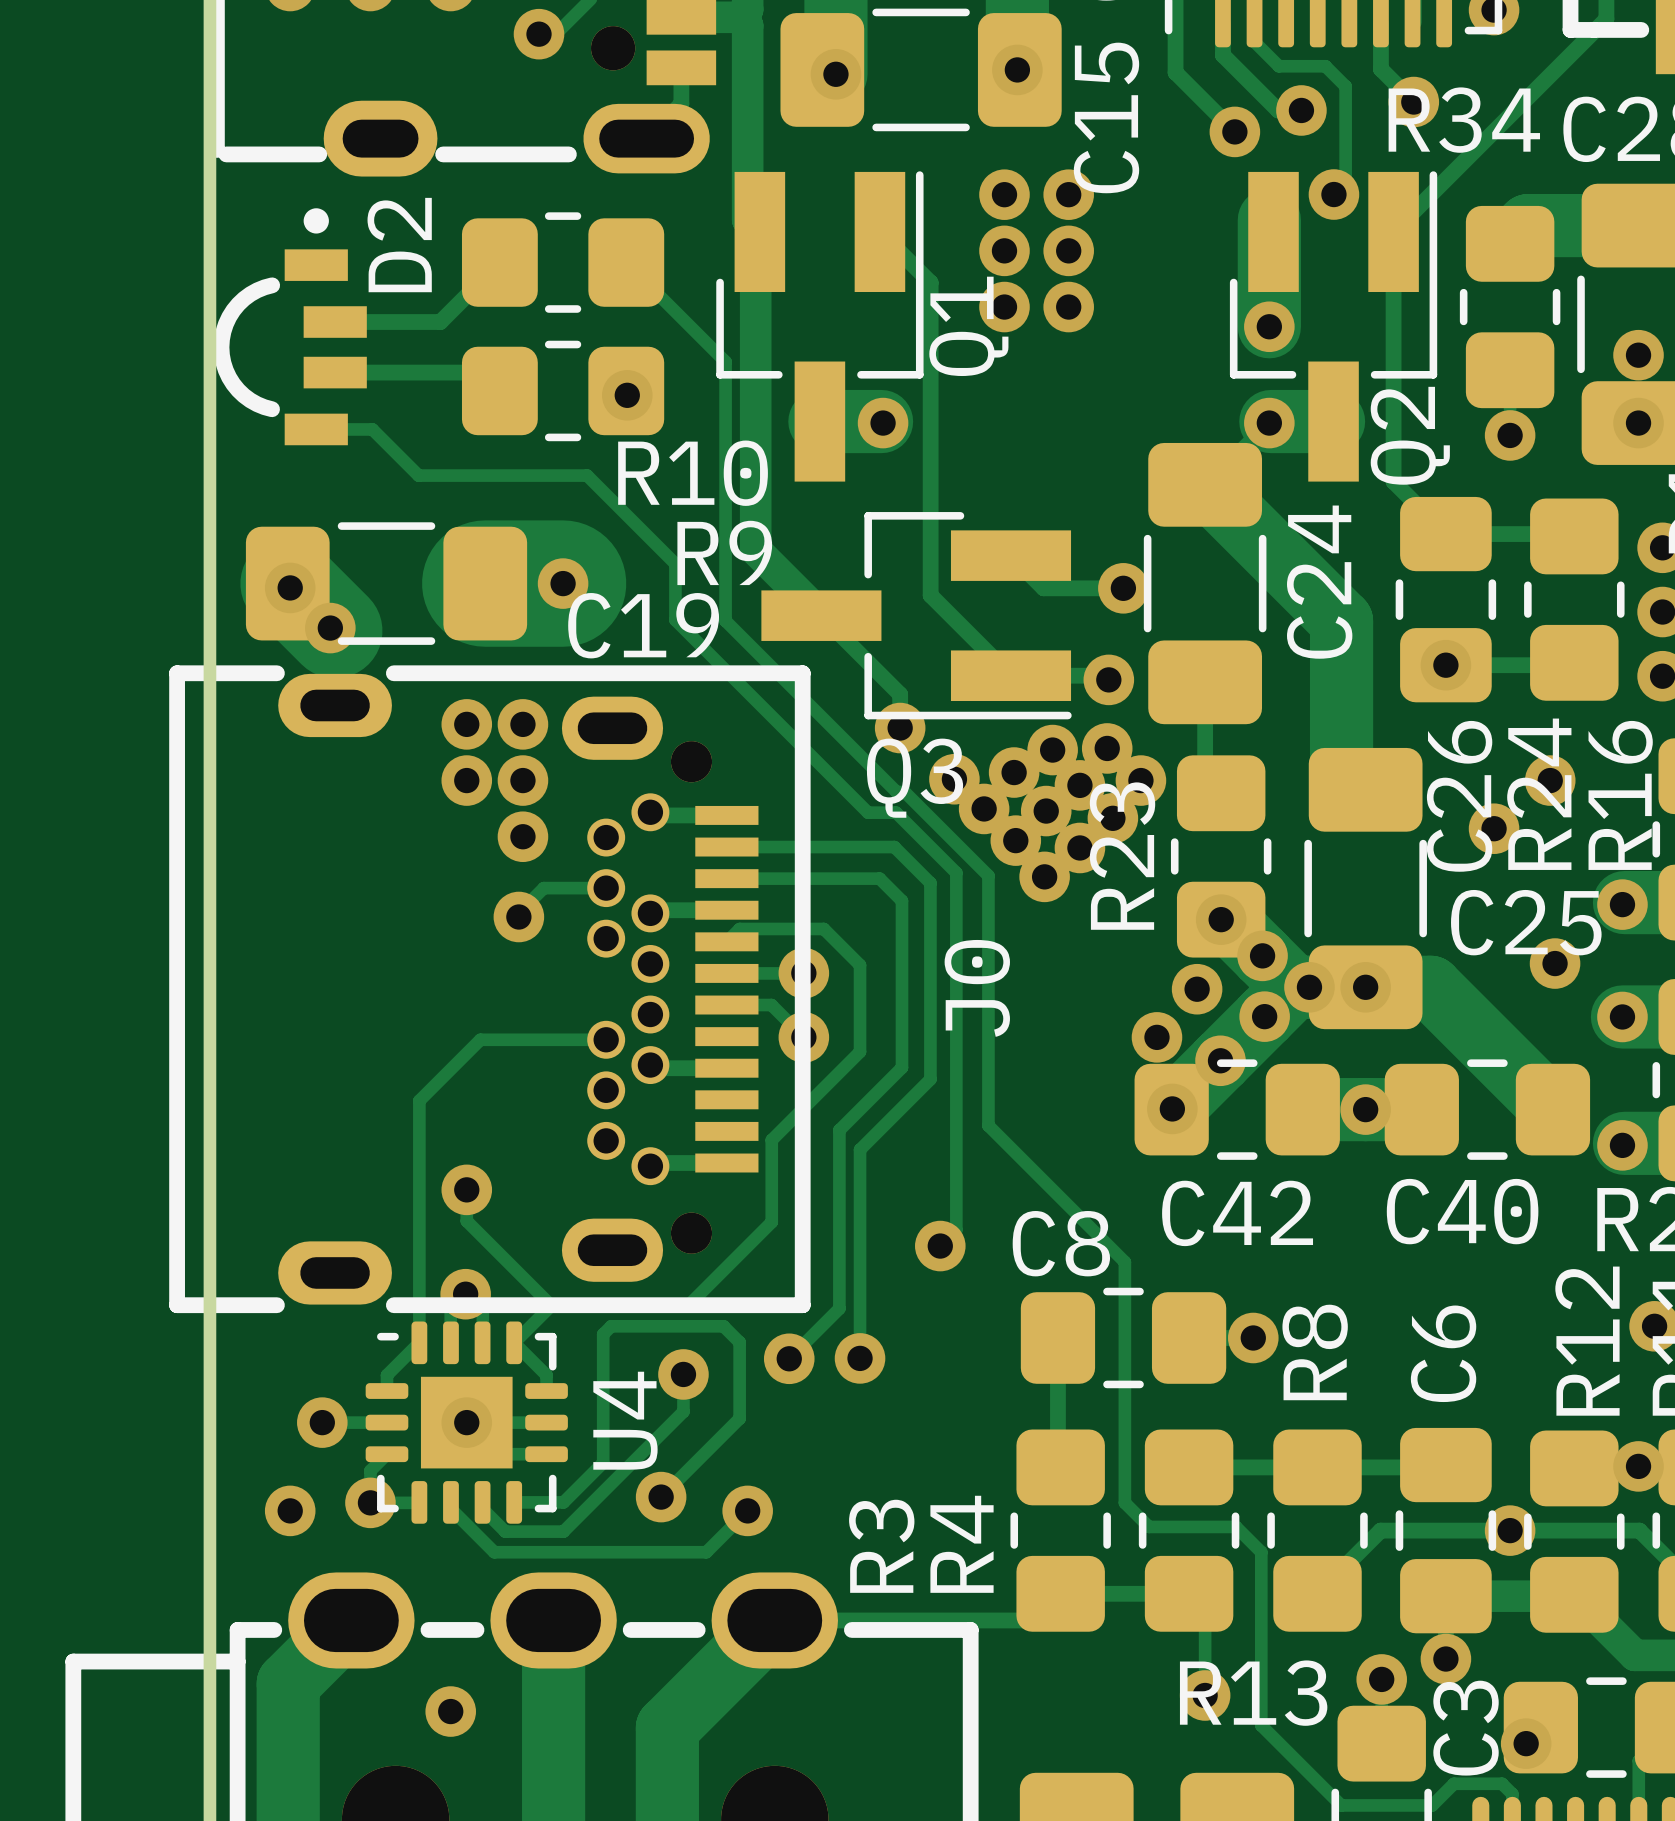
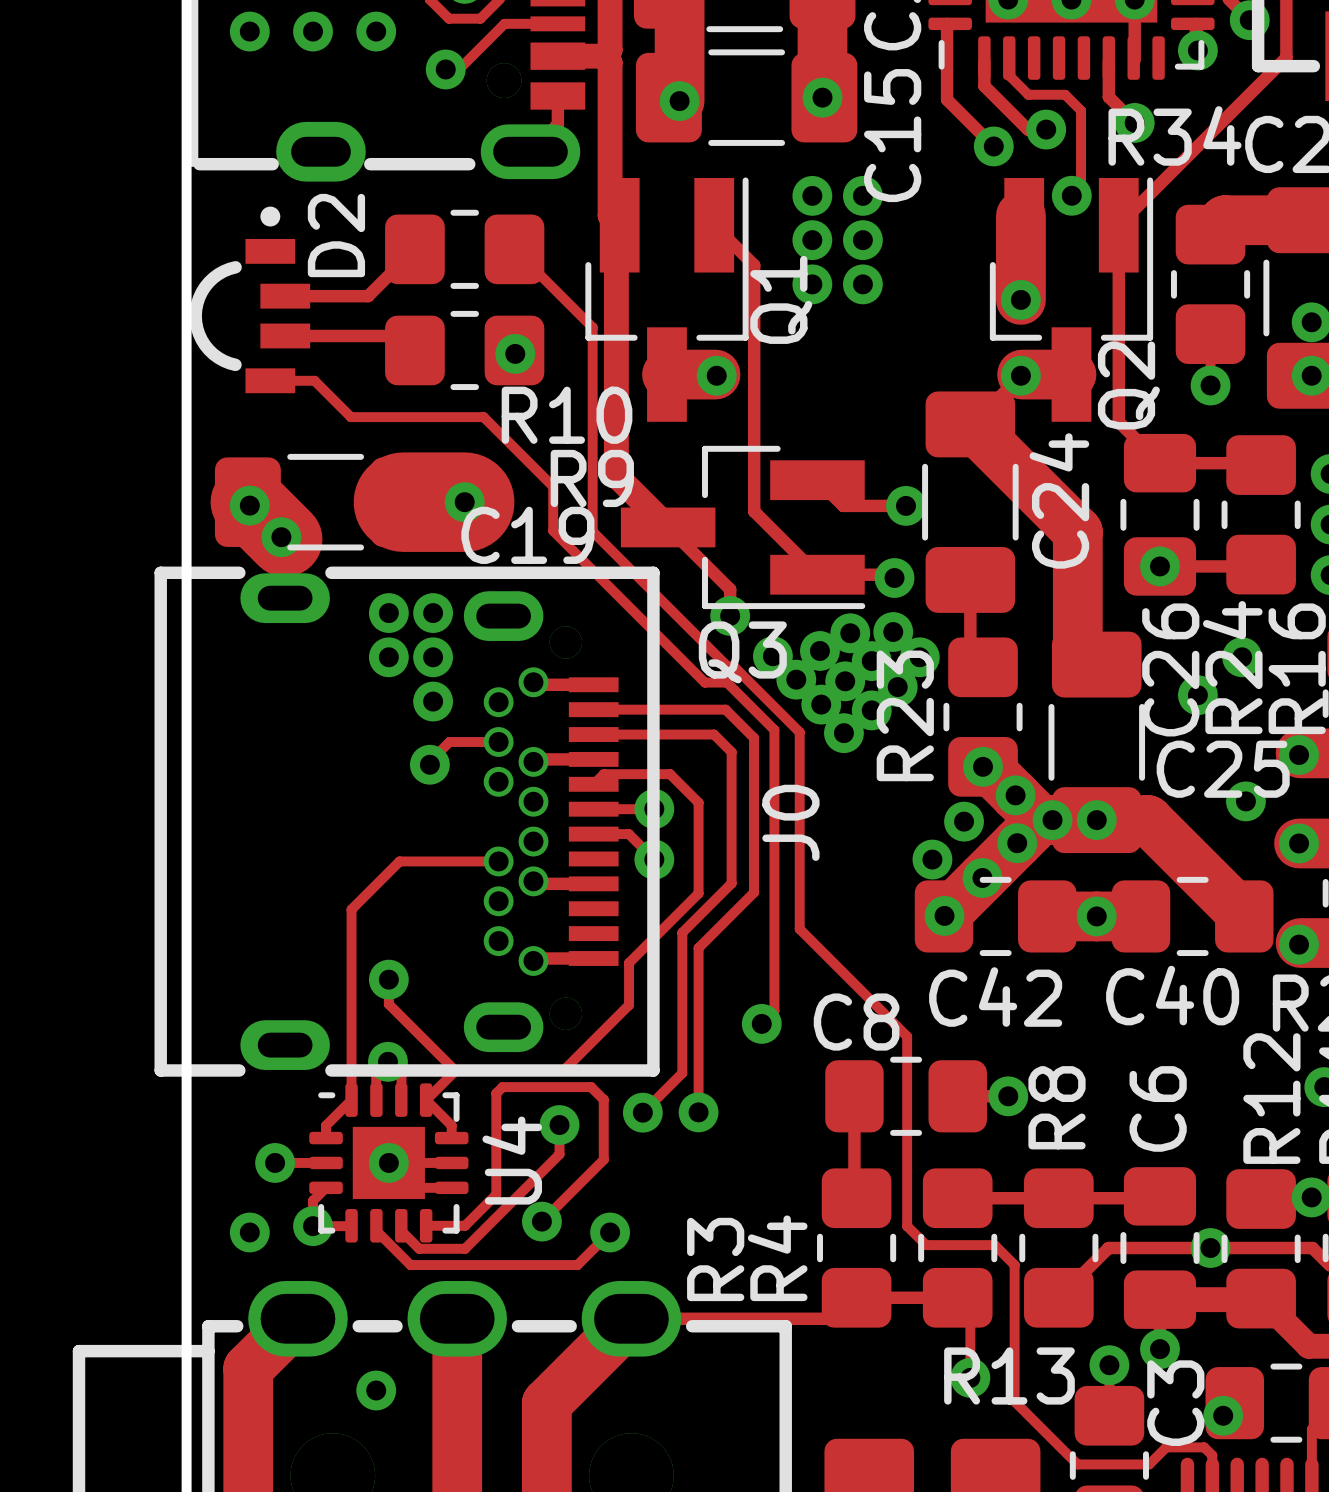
track: (860, 1051) (771, 1140) (771, 1168) -> (698, 870) (698, 893) (629, 962)

